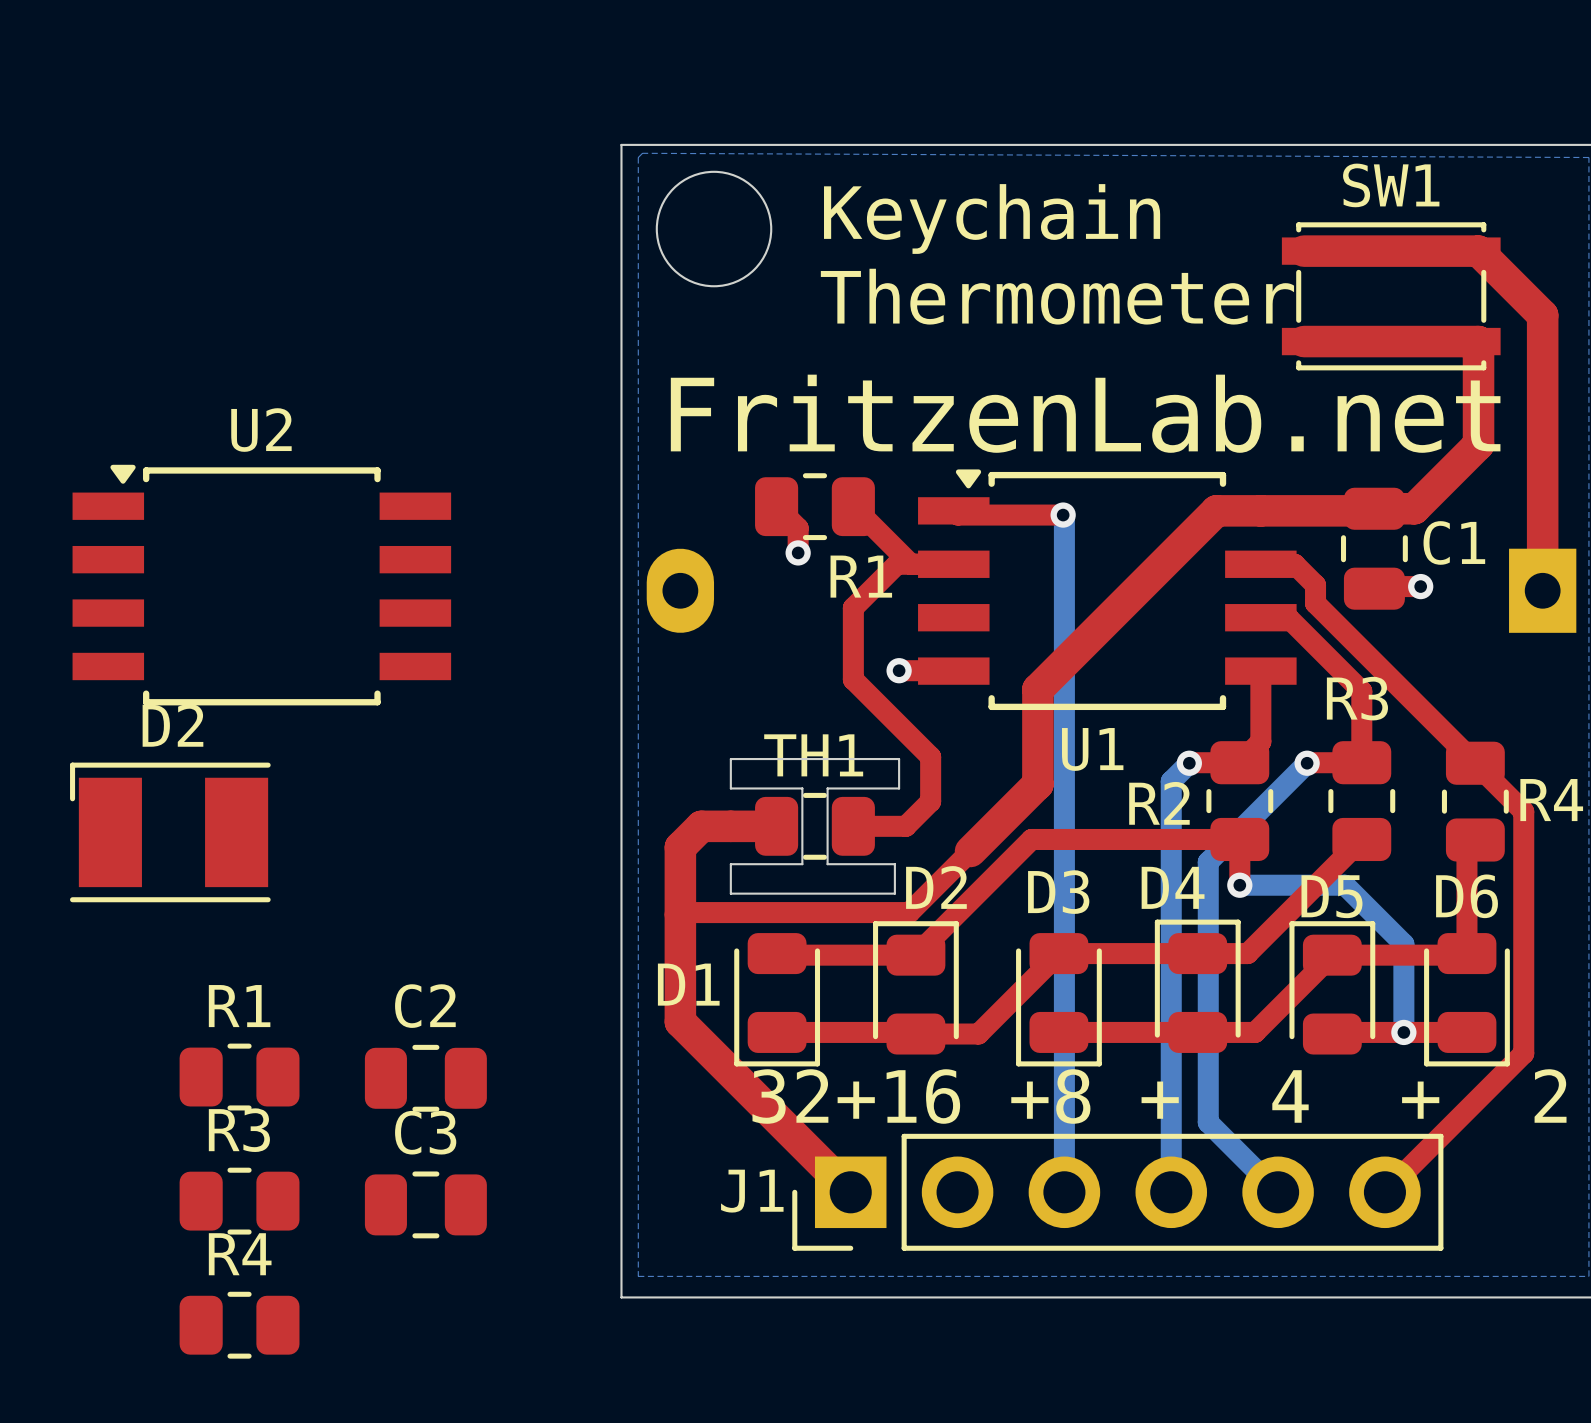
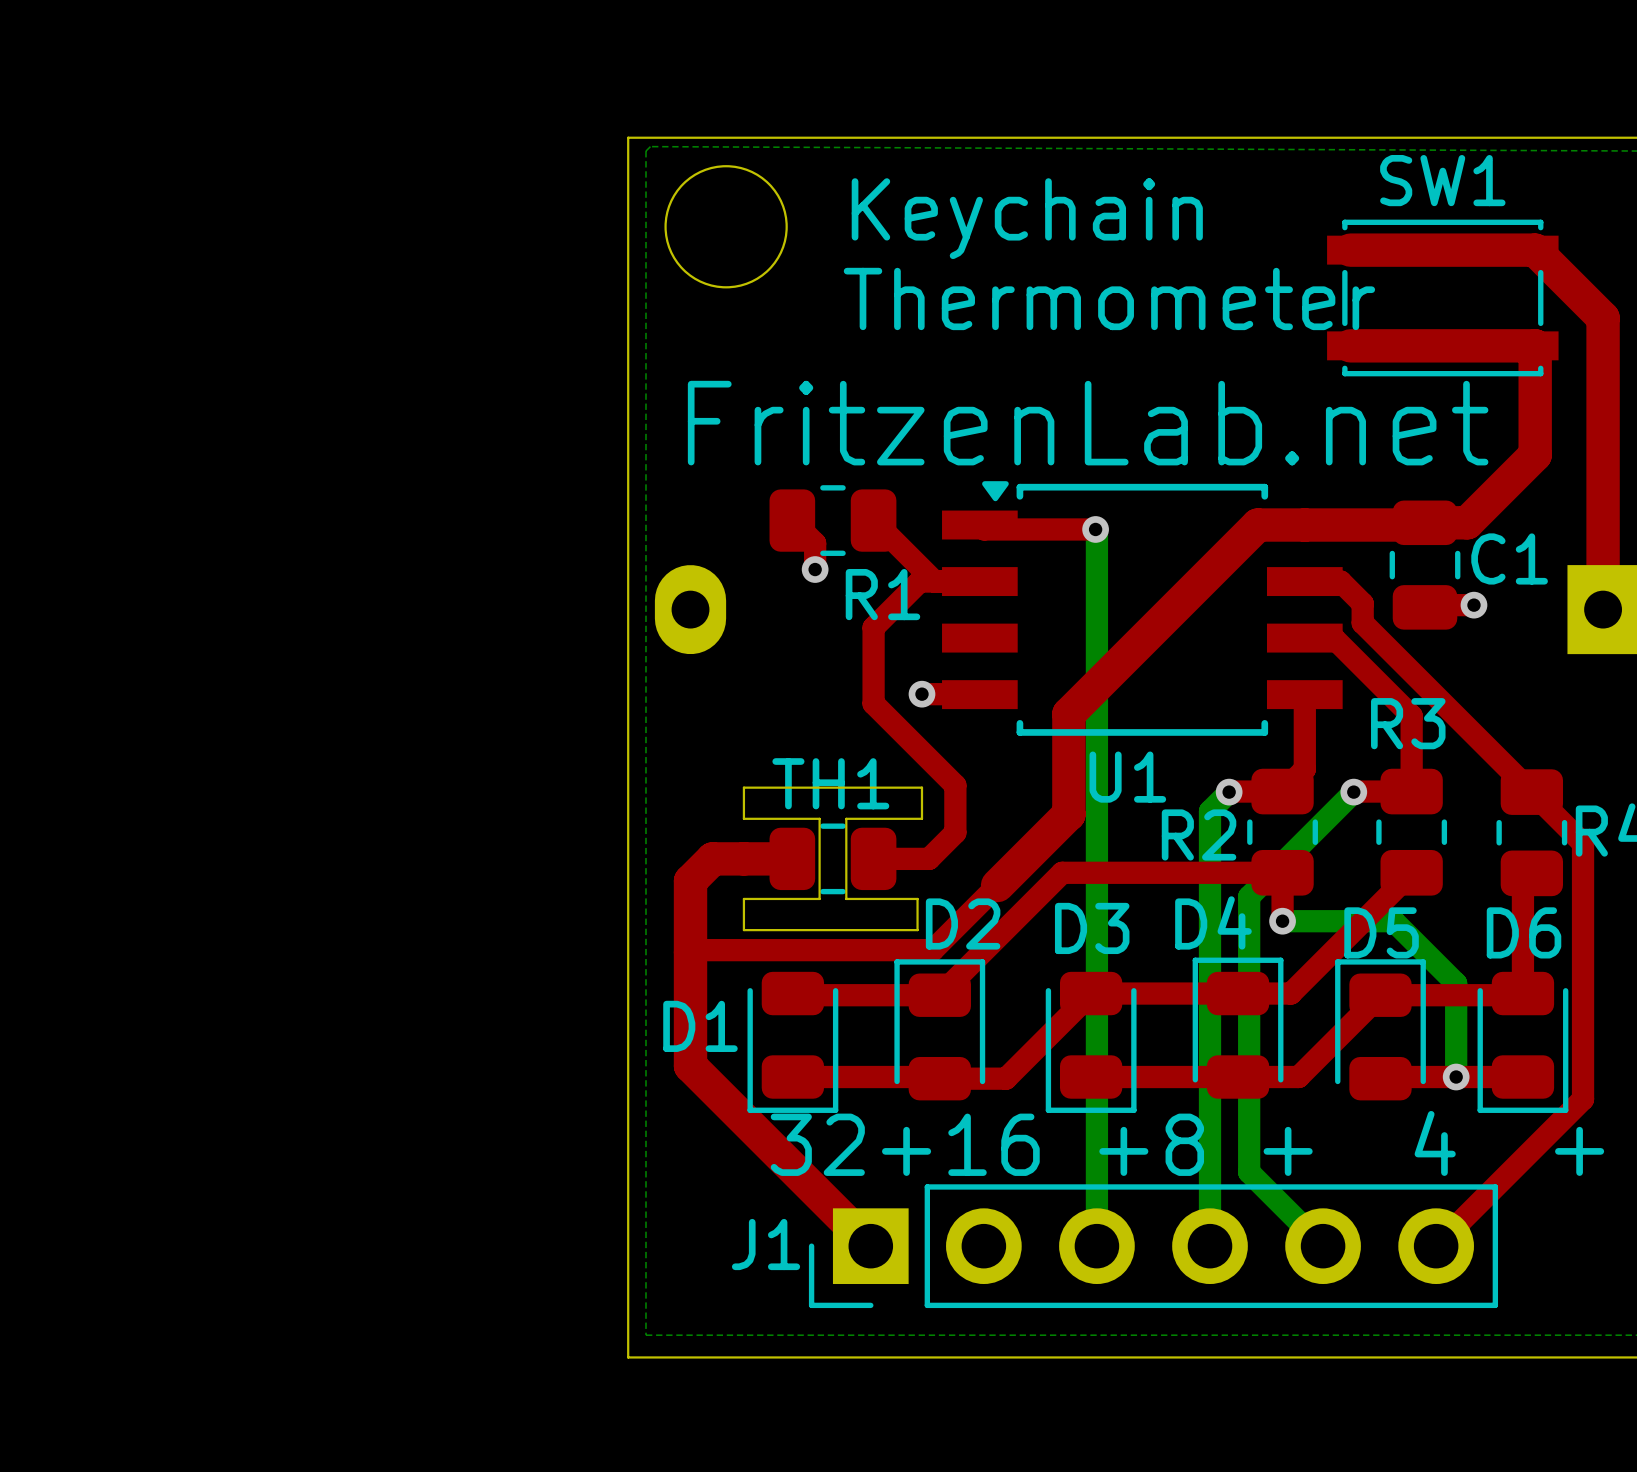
U2: (261, 585) -> none
D2: (170, 832) -> none
R1: (239, 1077) -> none
C2: (425, 1078) -> none
R3: (239, 1201) -> none
C3: (425, 1204) -> none
R4: (239, 1325) -> none

